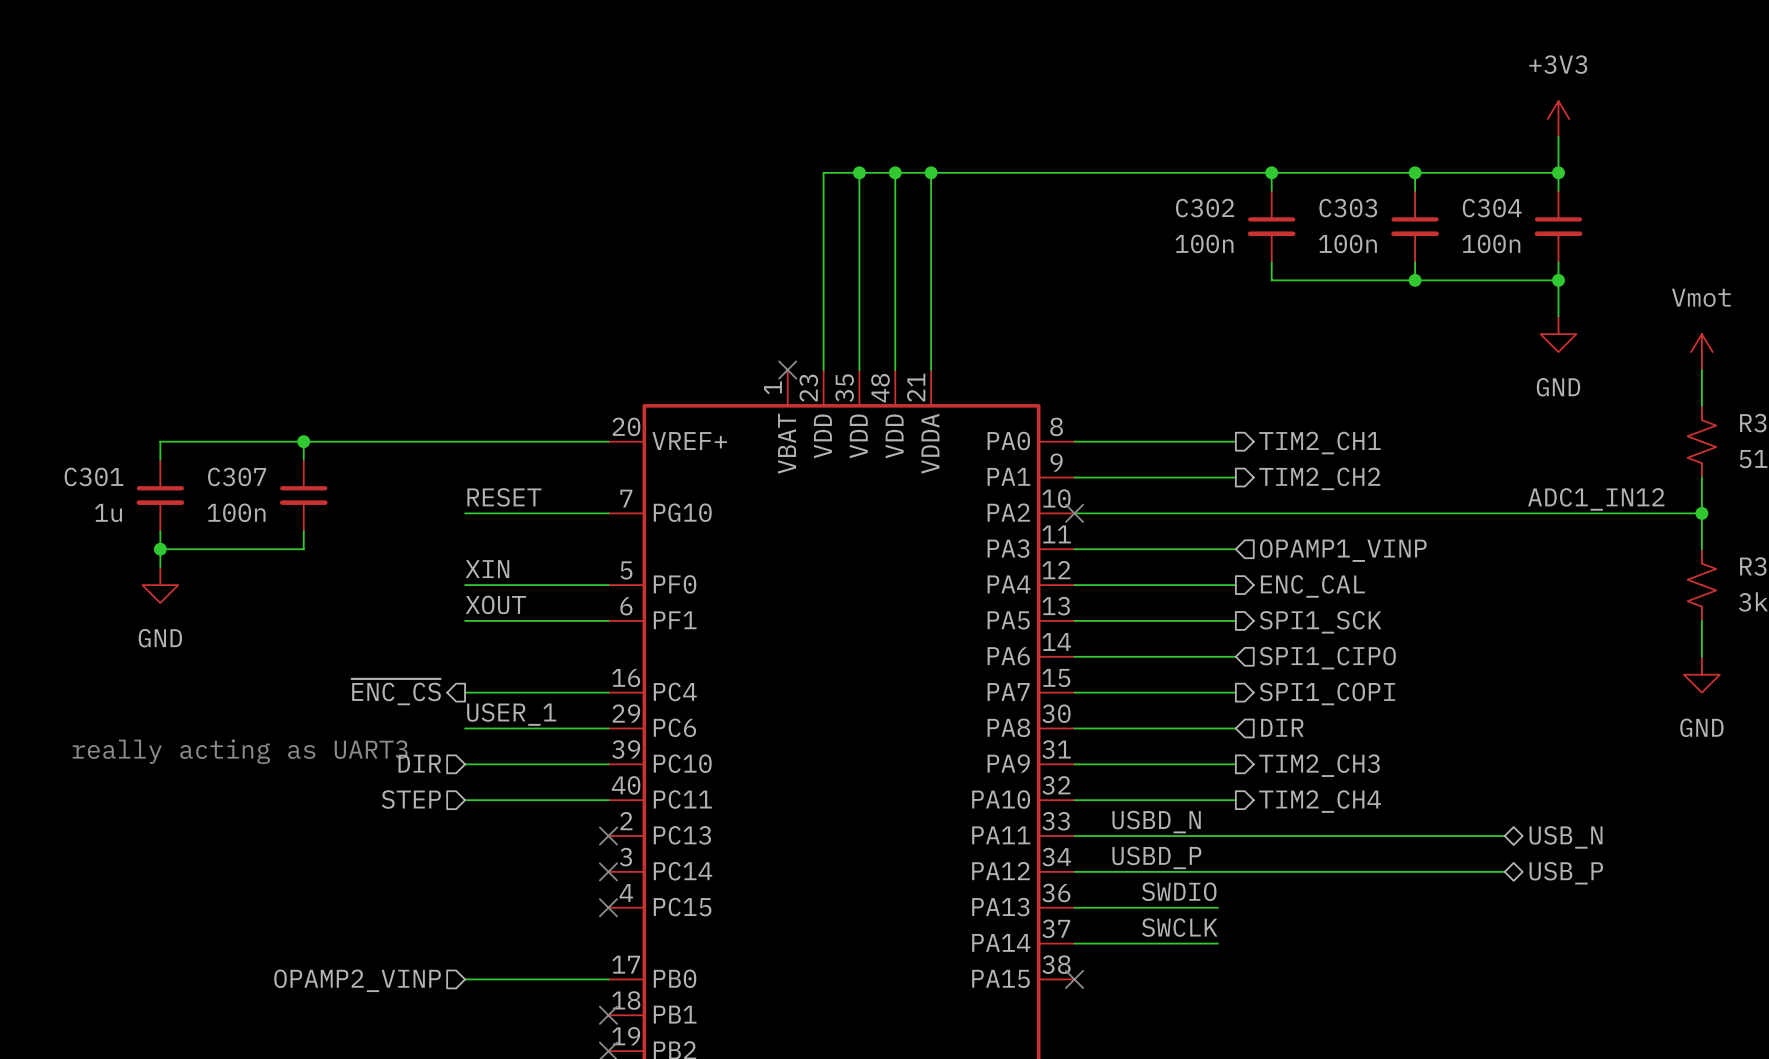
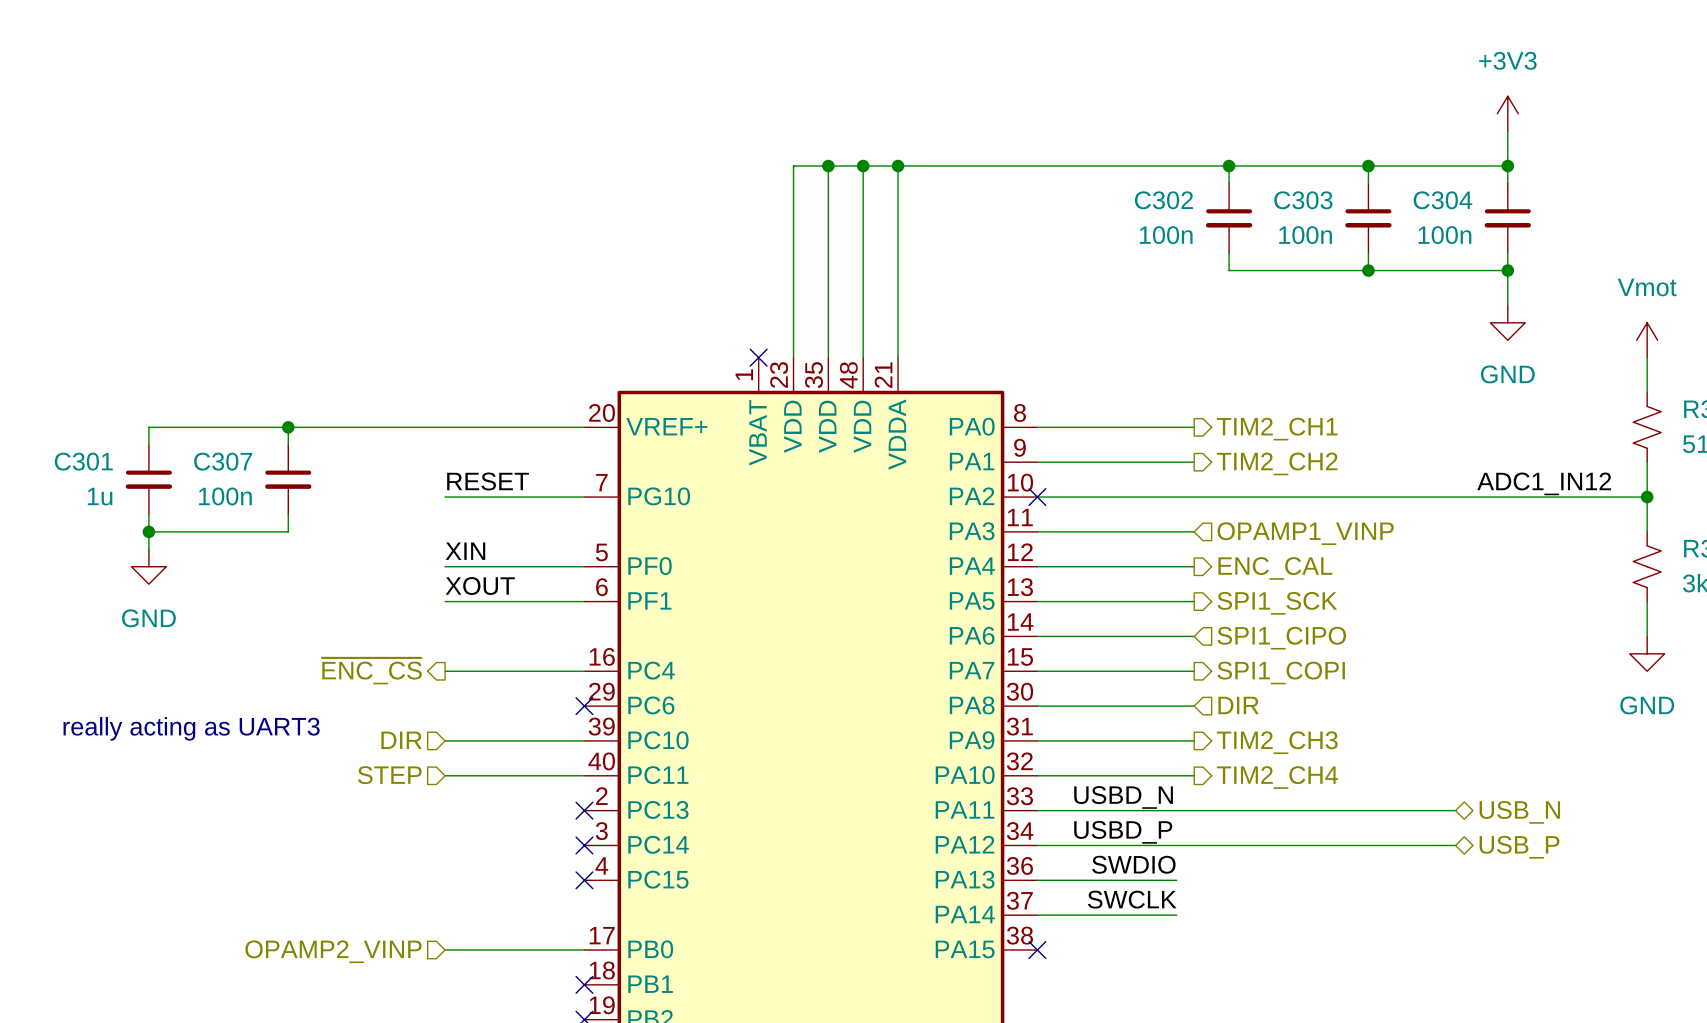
label: USER_1 (511, 714) -> none
wire: (465, 728) (608, 728) -> none
no-connect mark: none -> (584, 706)

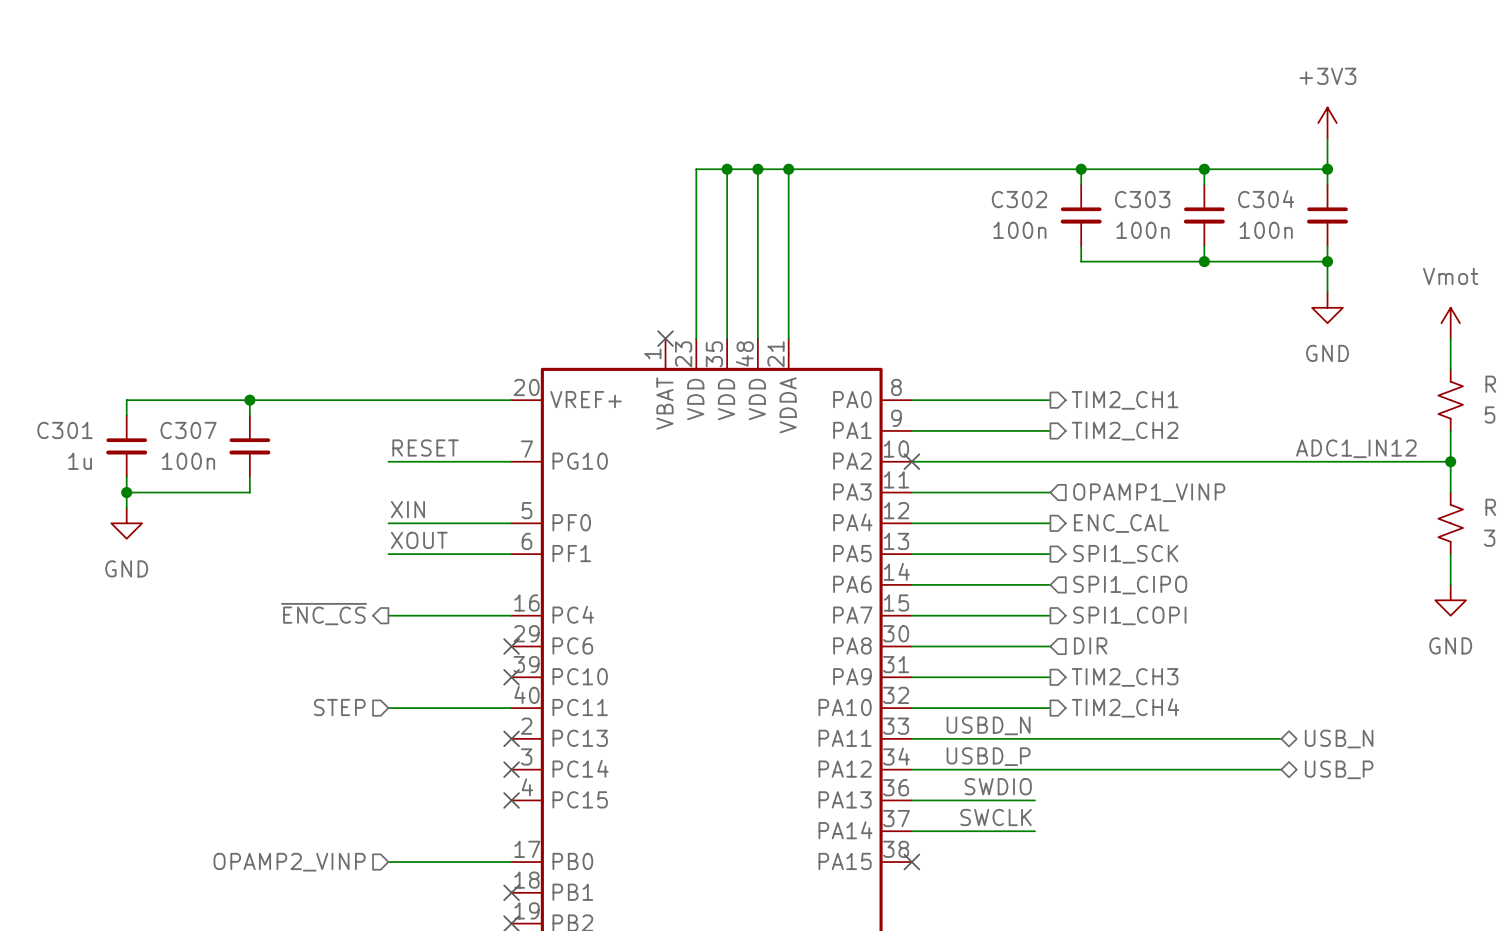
text: really acting as UART3 (191, 728) -> none
hierarchical label: DIR (401, 740) -> none
wire: (445, 740) (584, 740) -> none
no-connect mark: none -> (511, 677)

